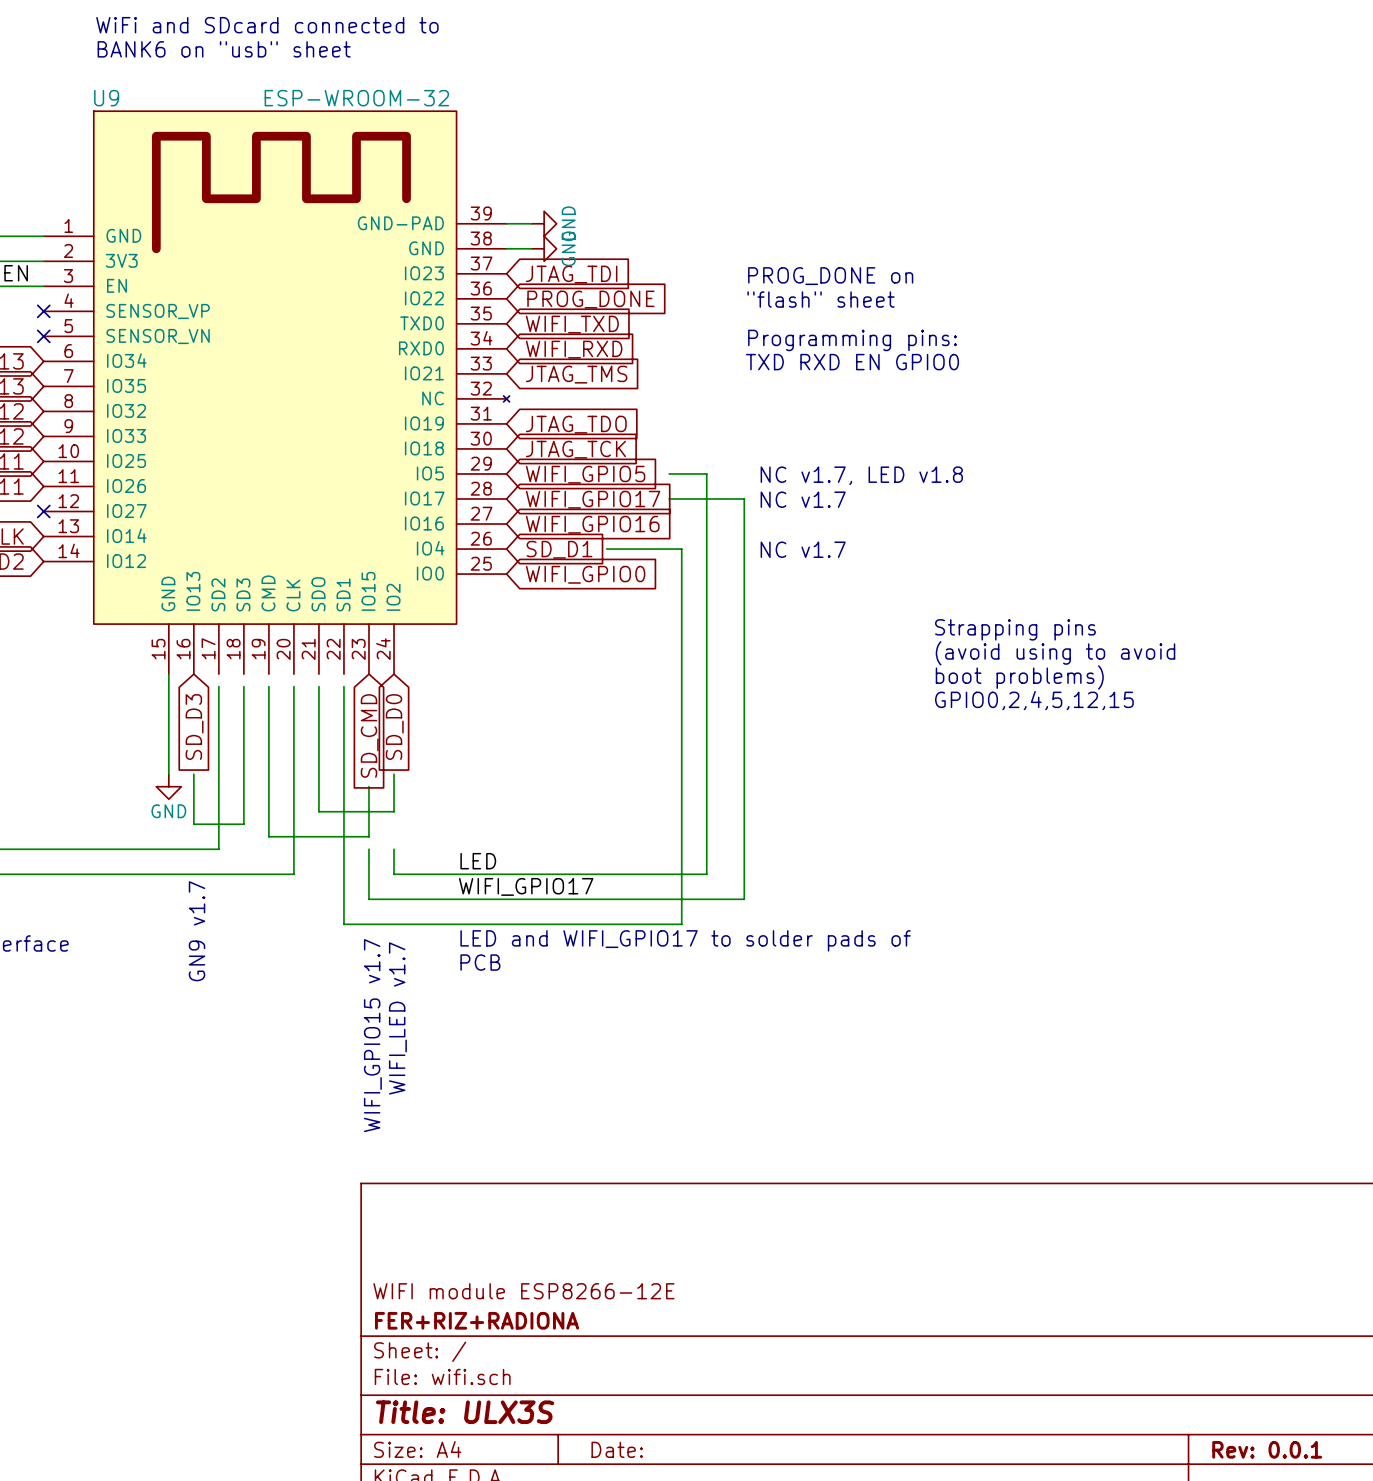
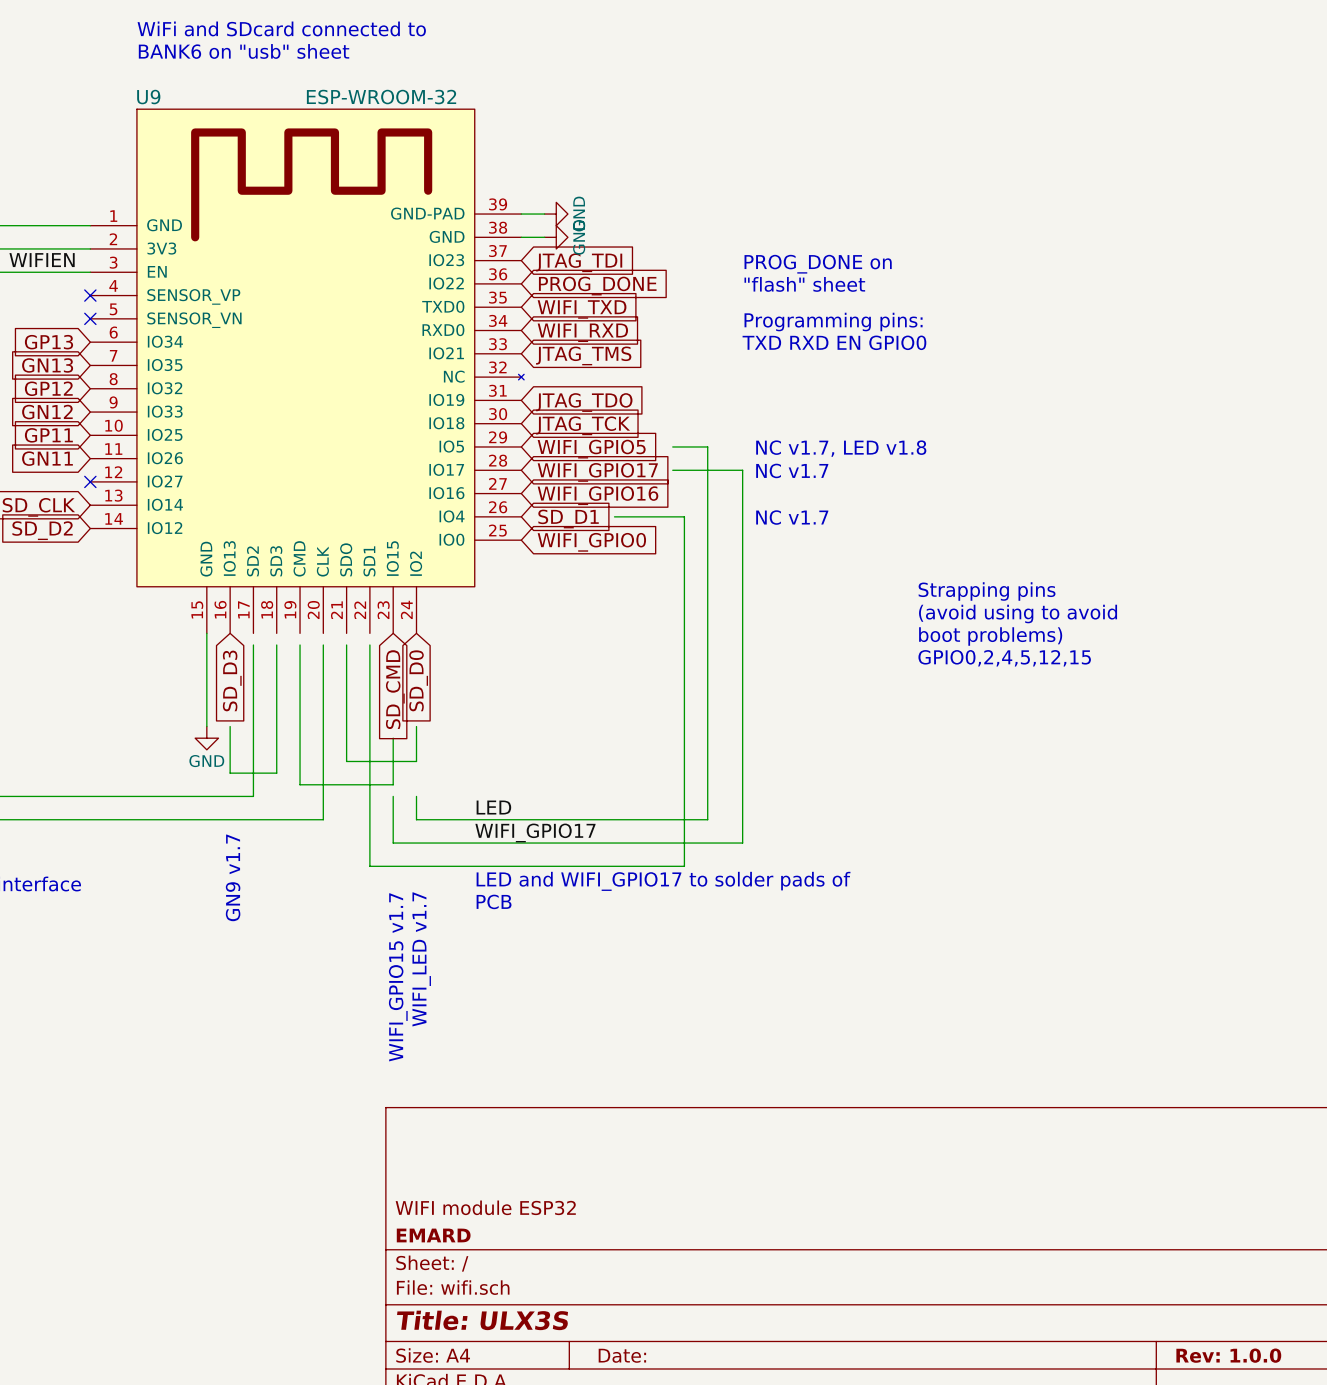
title block: WIFI module ESP8266-12E (523, 1291) -> WIFI module ESP32 (485, 1207)
title block: FER+RIZ+RADIONA (477, 1320) -> EMARD (433, 1235)
title block: Rev: 0.0.1 (1267, 1449) -> Rev: 1.0.0 (1228, 1355)

